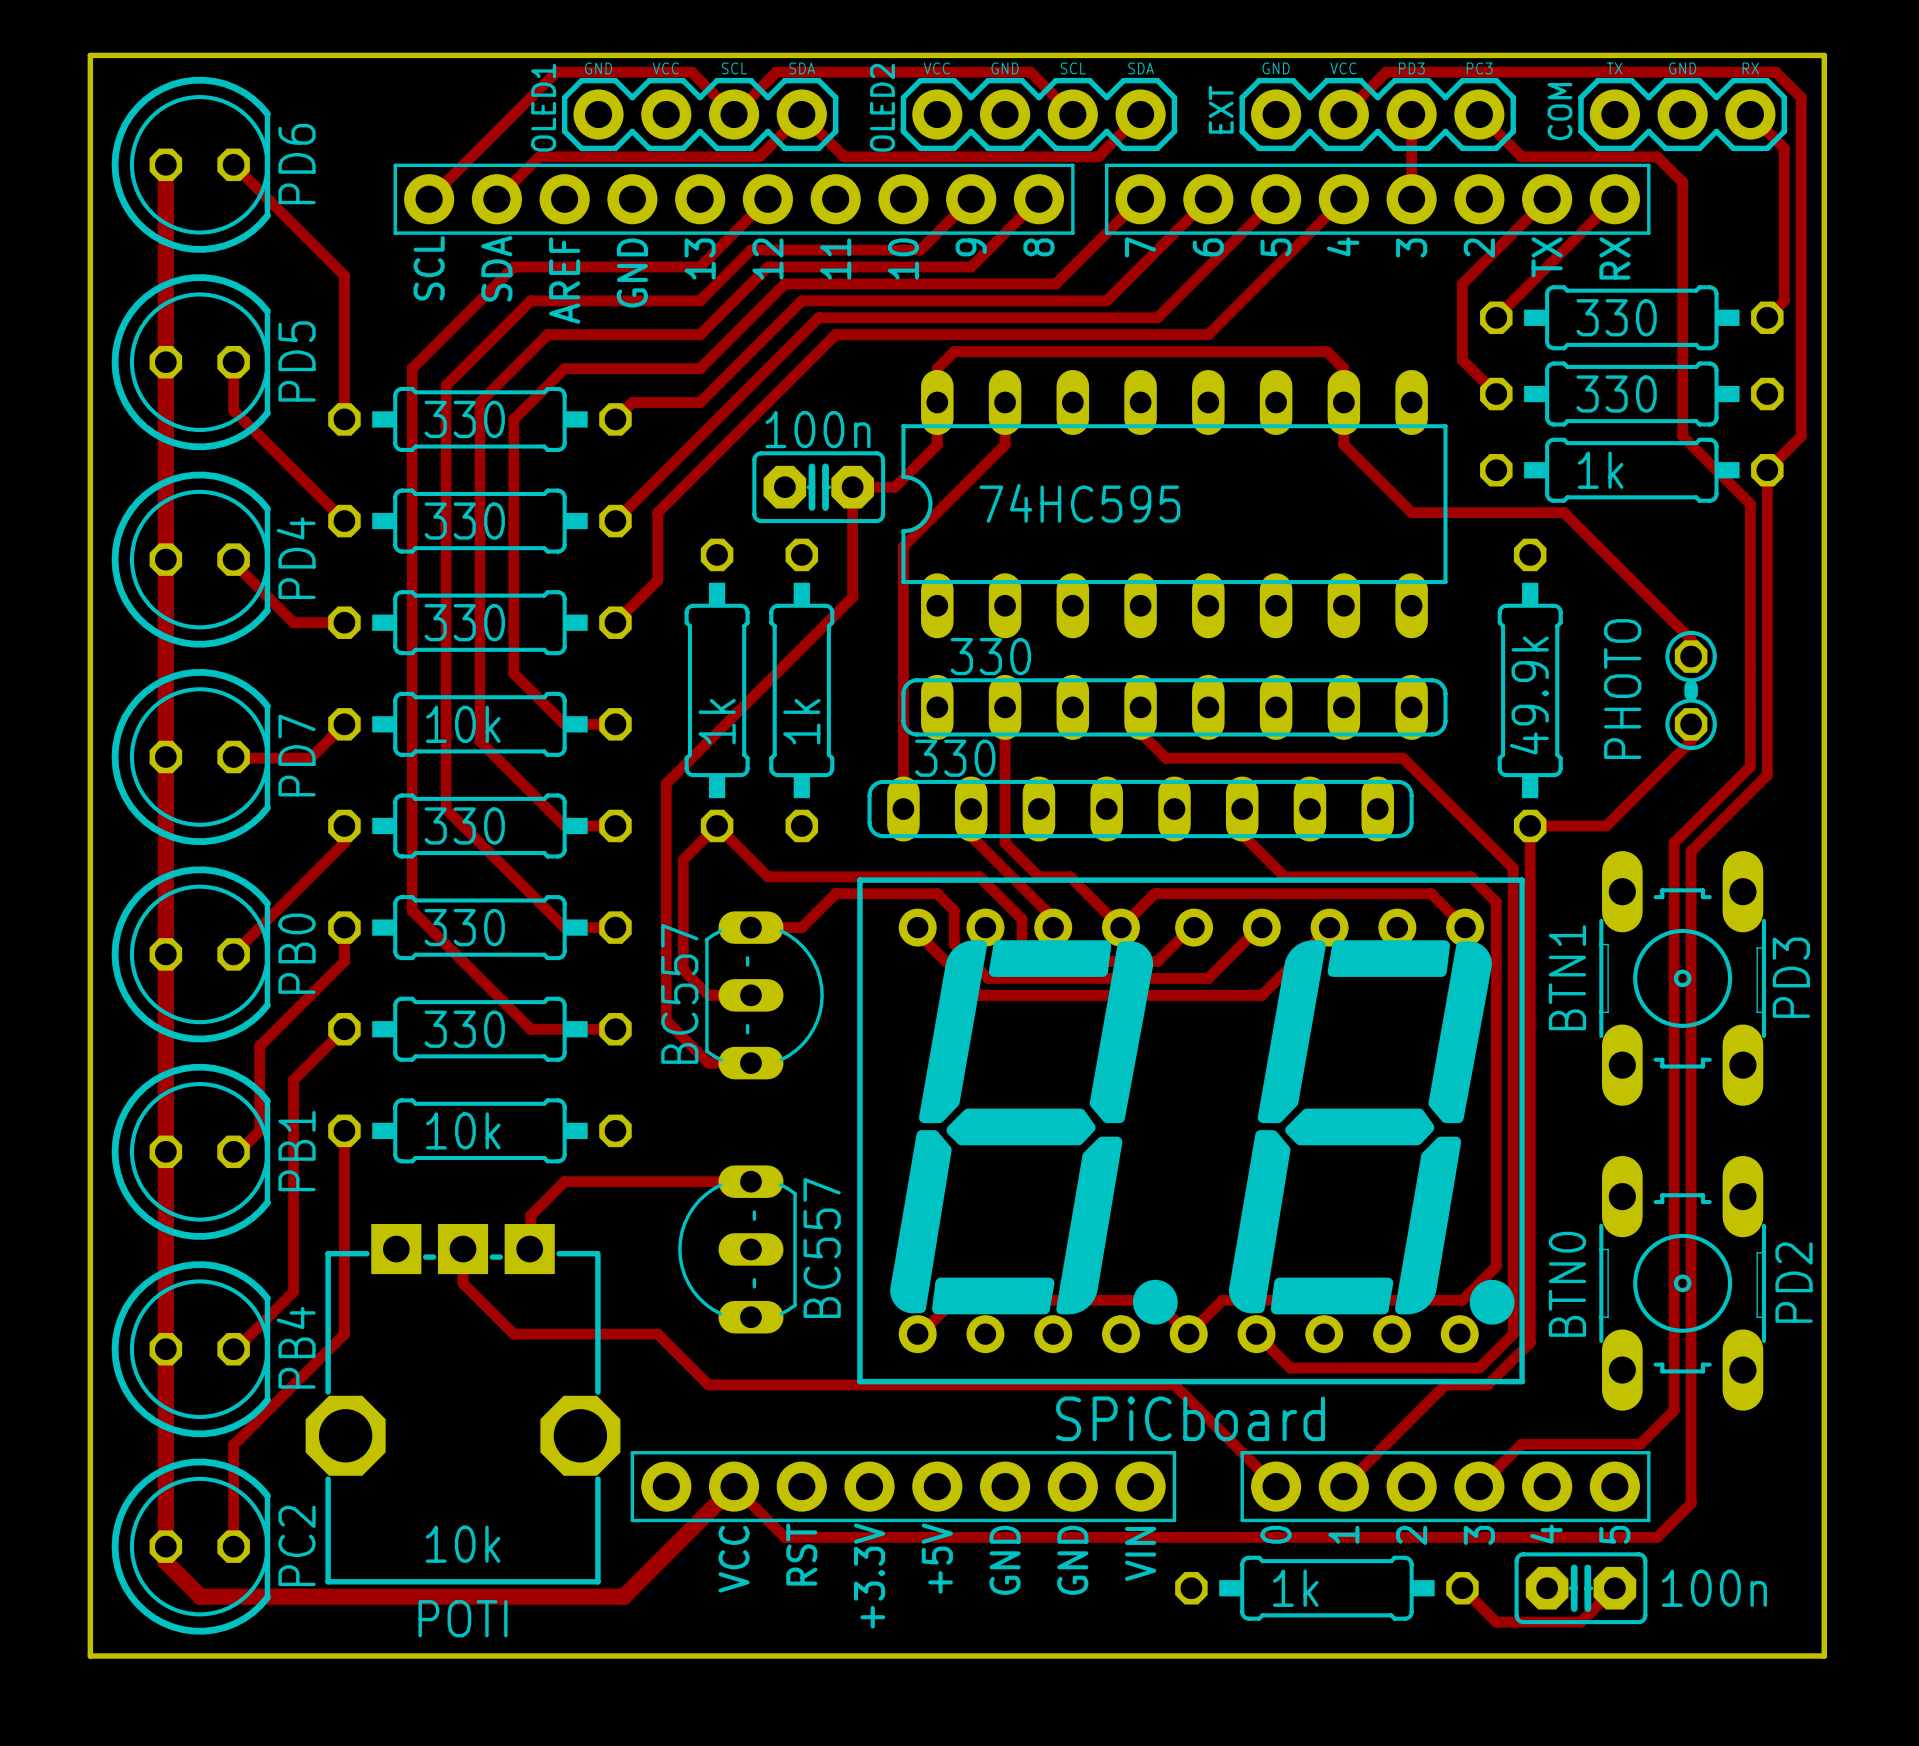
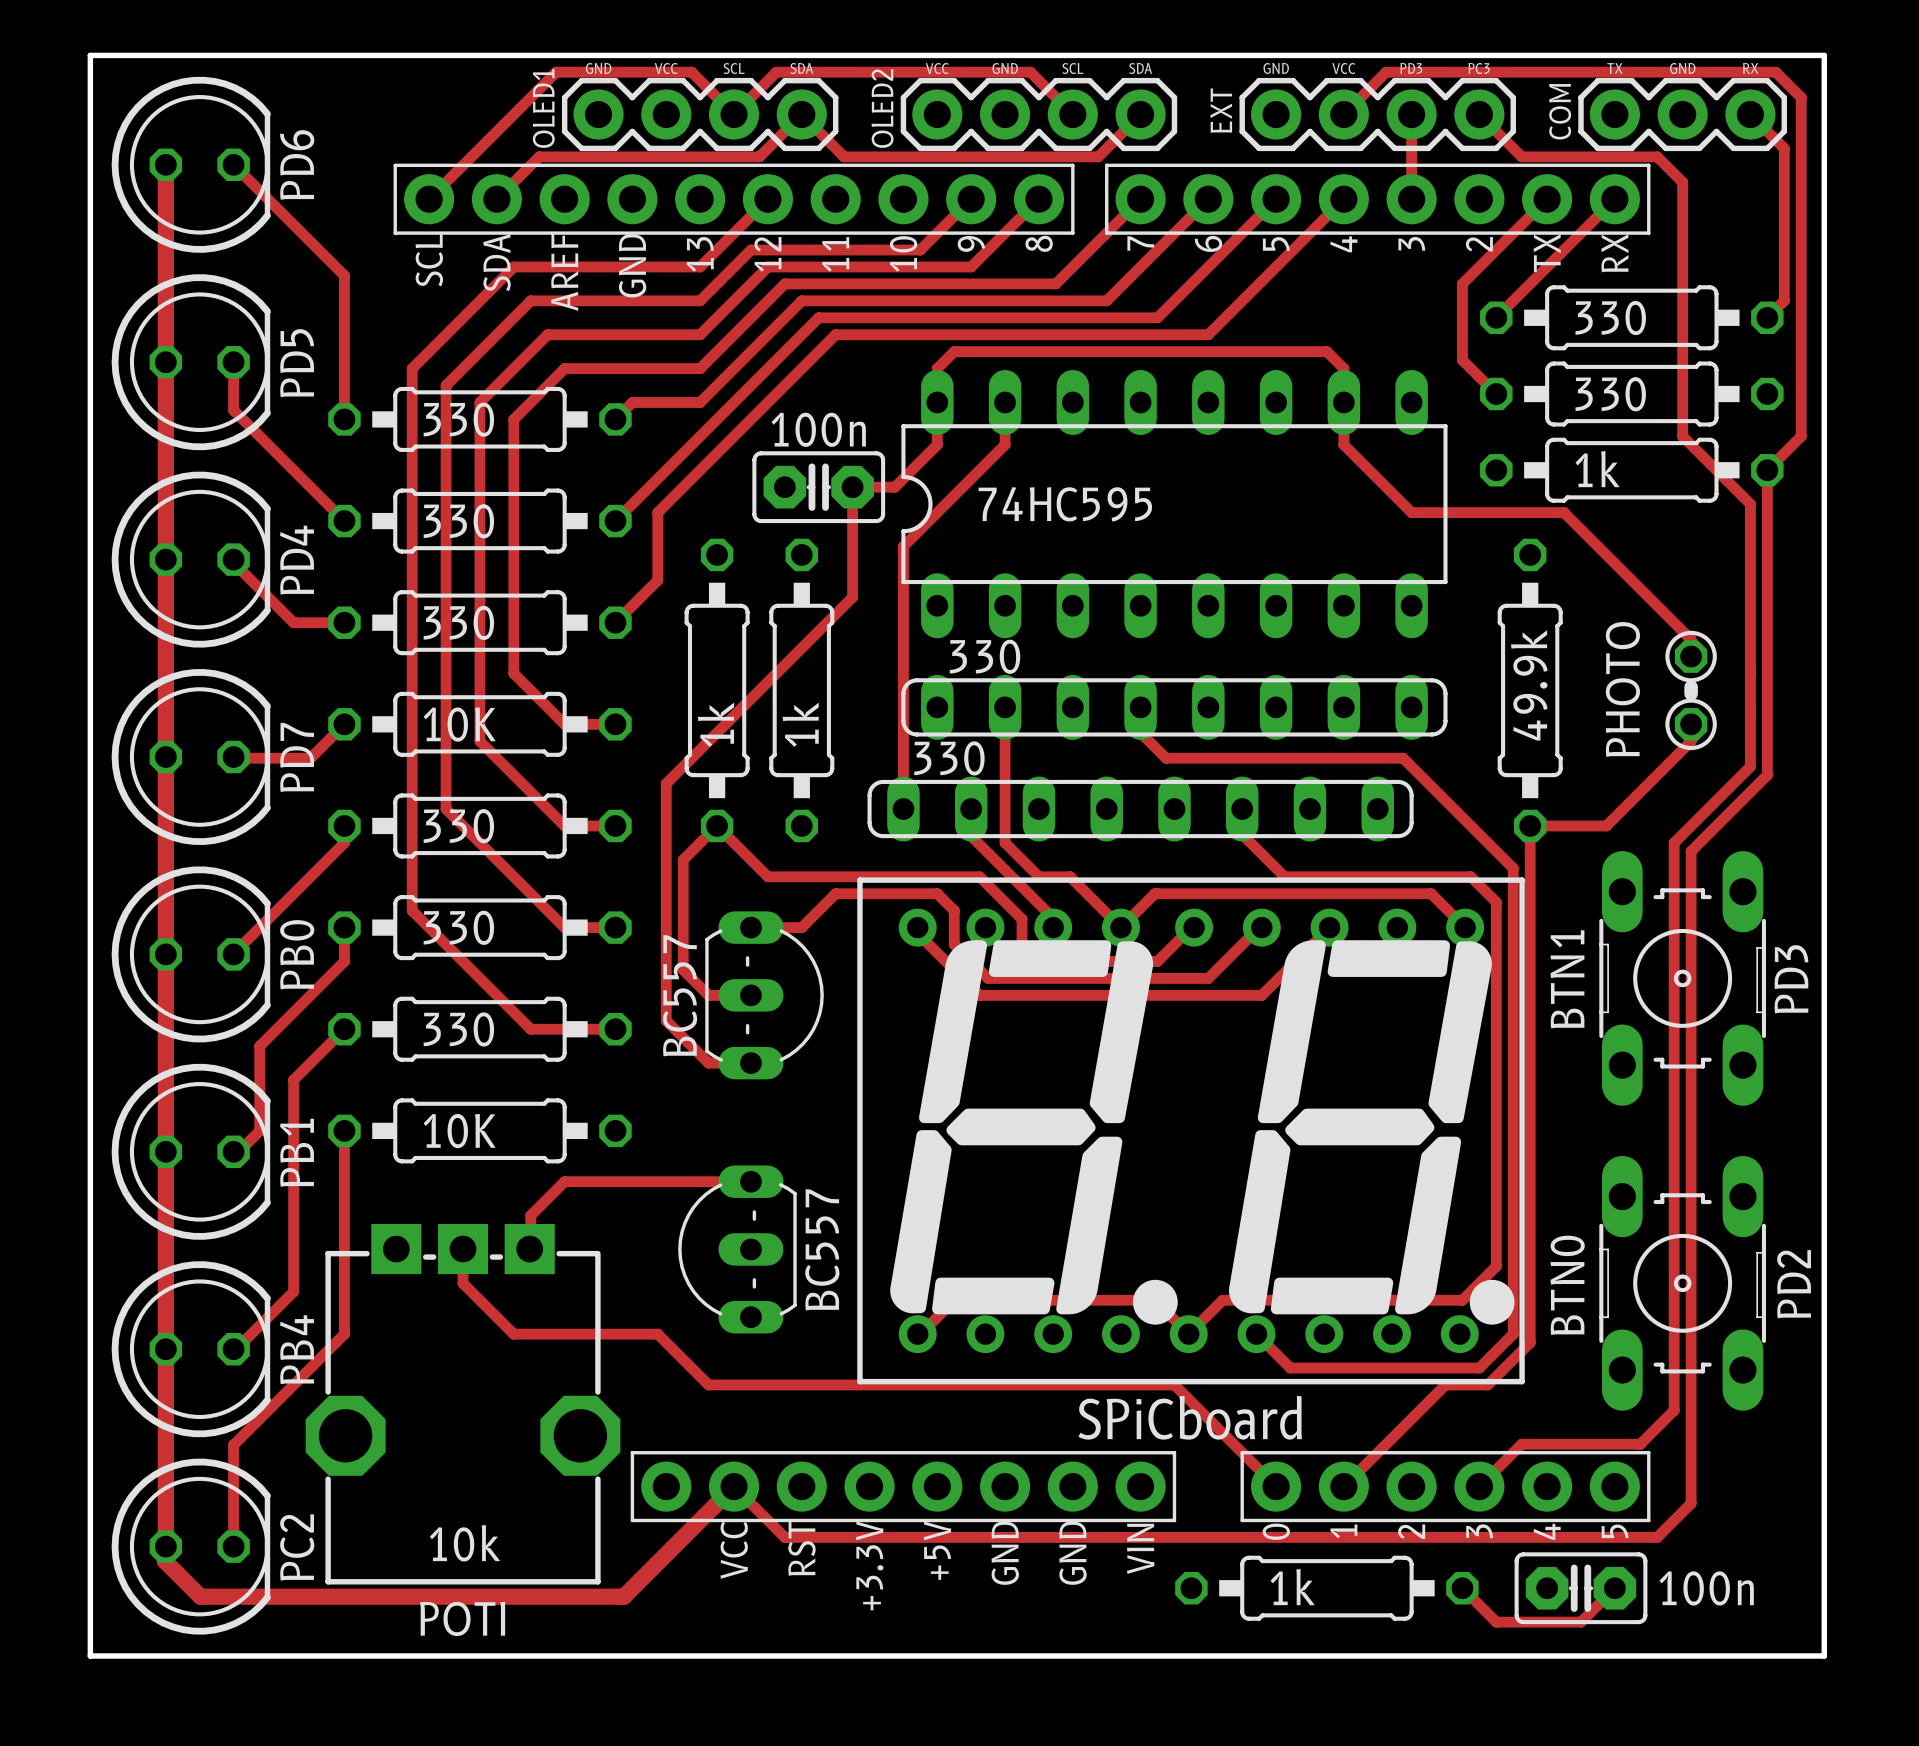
part value: 10k (463, 724) -> 10K (459, 724)
part value: 10k (463, 1130) -> 10K (459, 1131)

